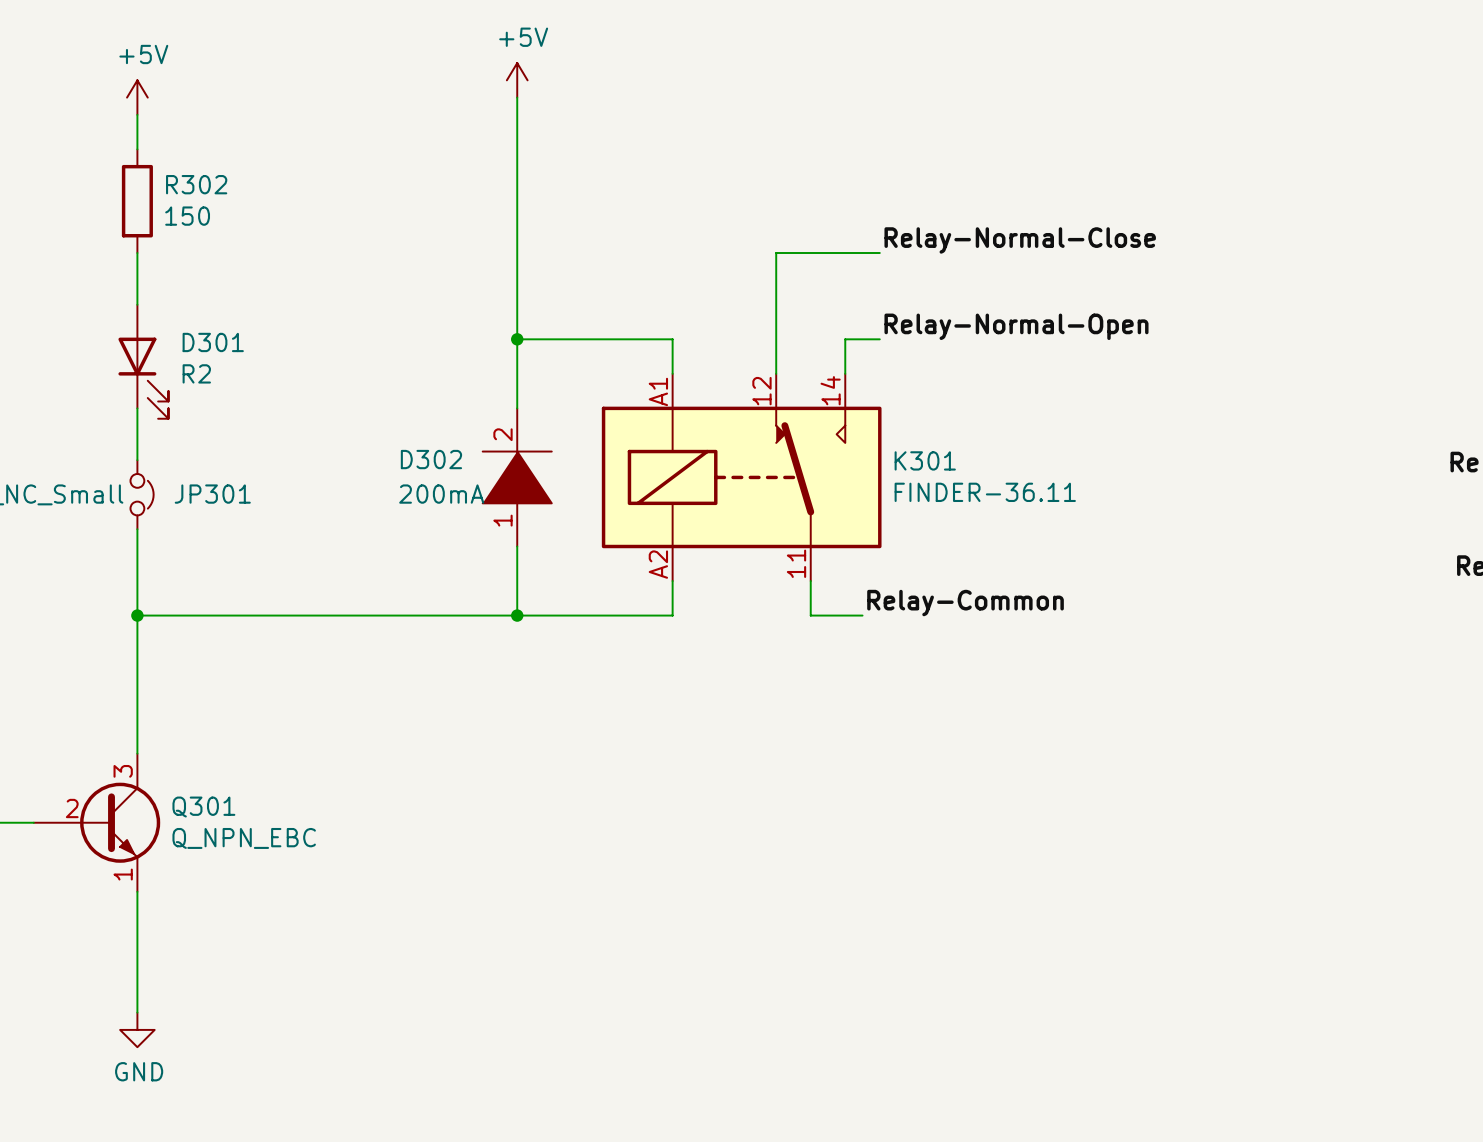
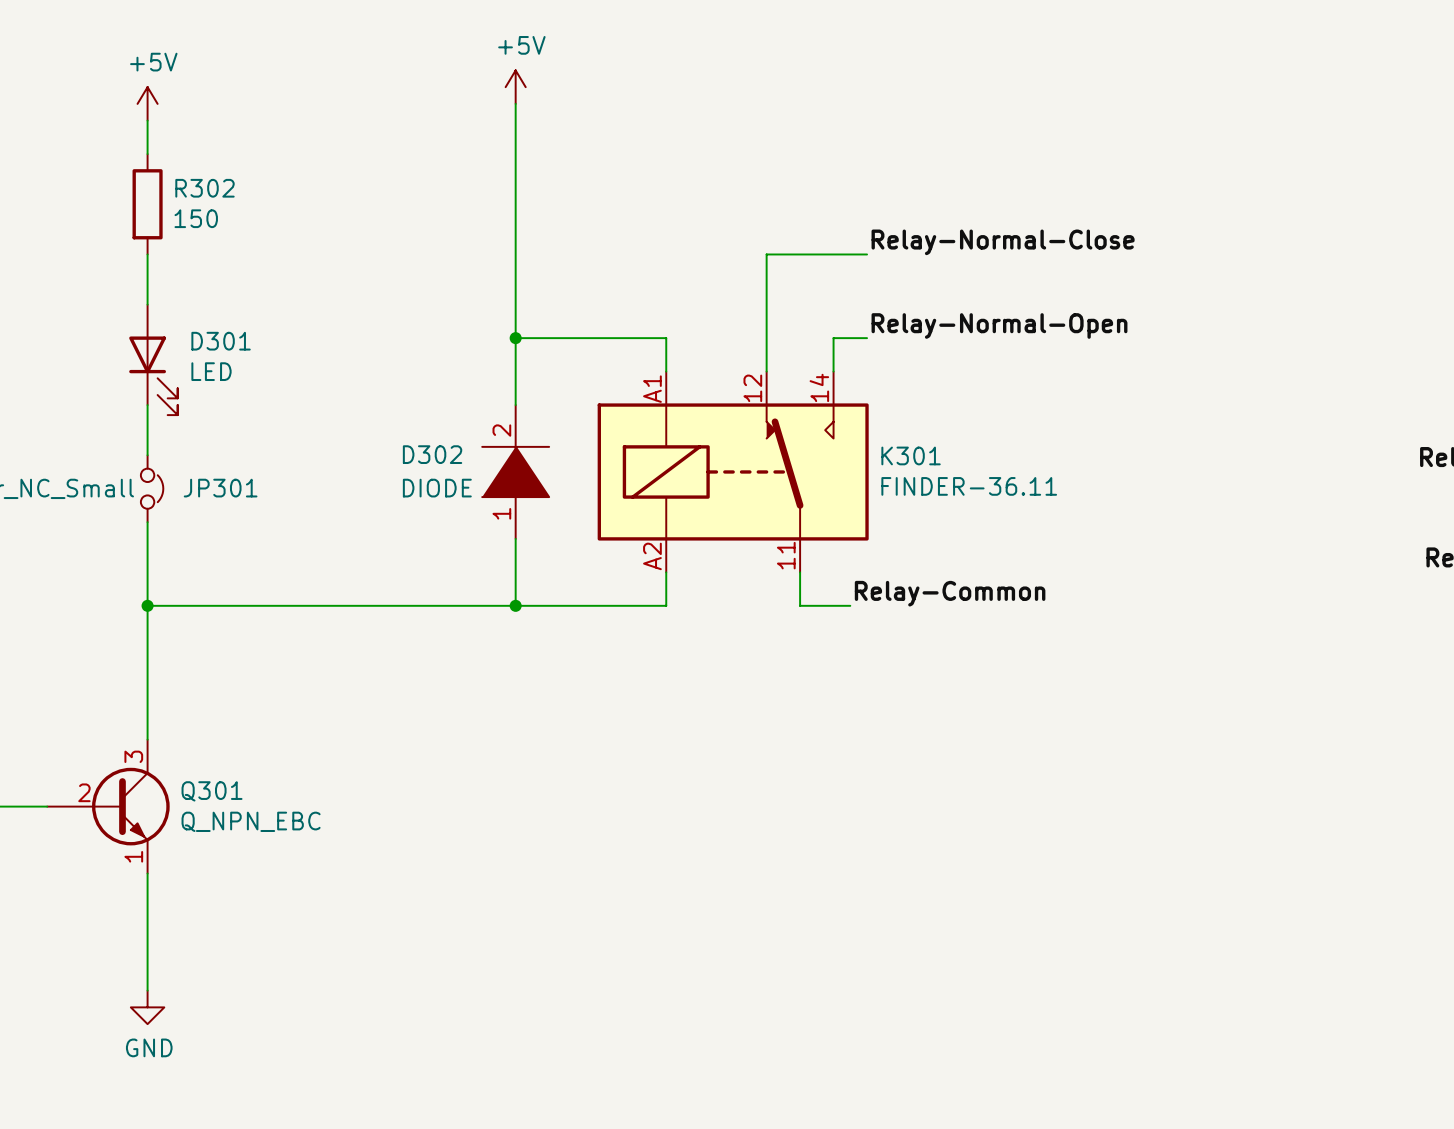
D301 value: R2 (196, 373) -> LED (211, 371)
D302 value: 200mA (441, 494) -> DIODE (437, 488)

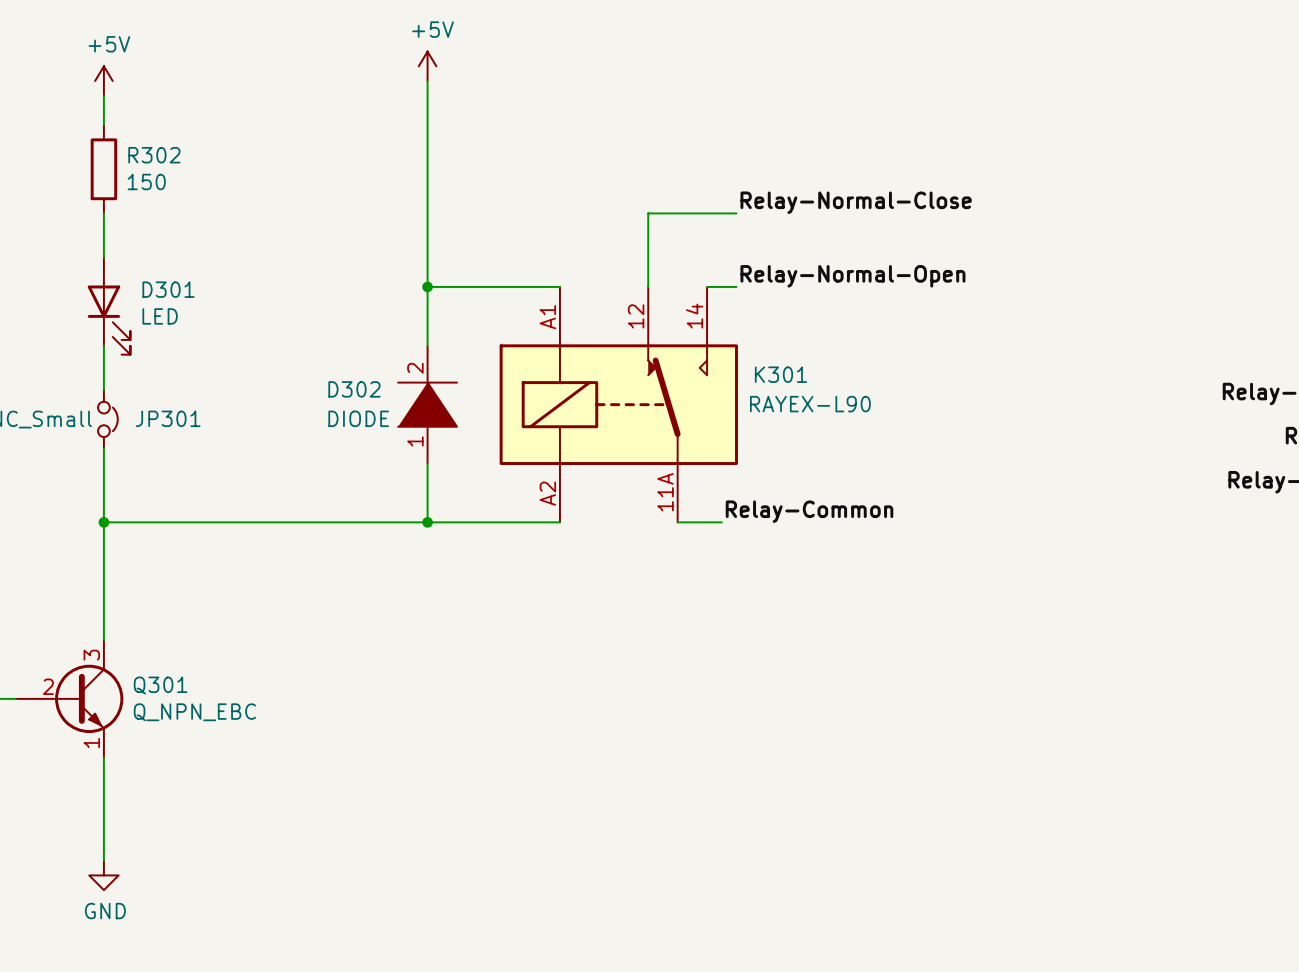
K301 symbol: [597, 371, 869, 573] -> [499, 286, 738, 523]
K301 value: FINDER-36.11 (969, 486) -> RAYEX-L90 (810, 404)

